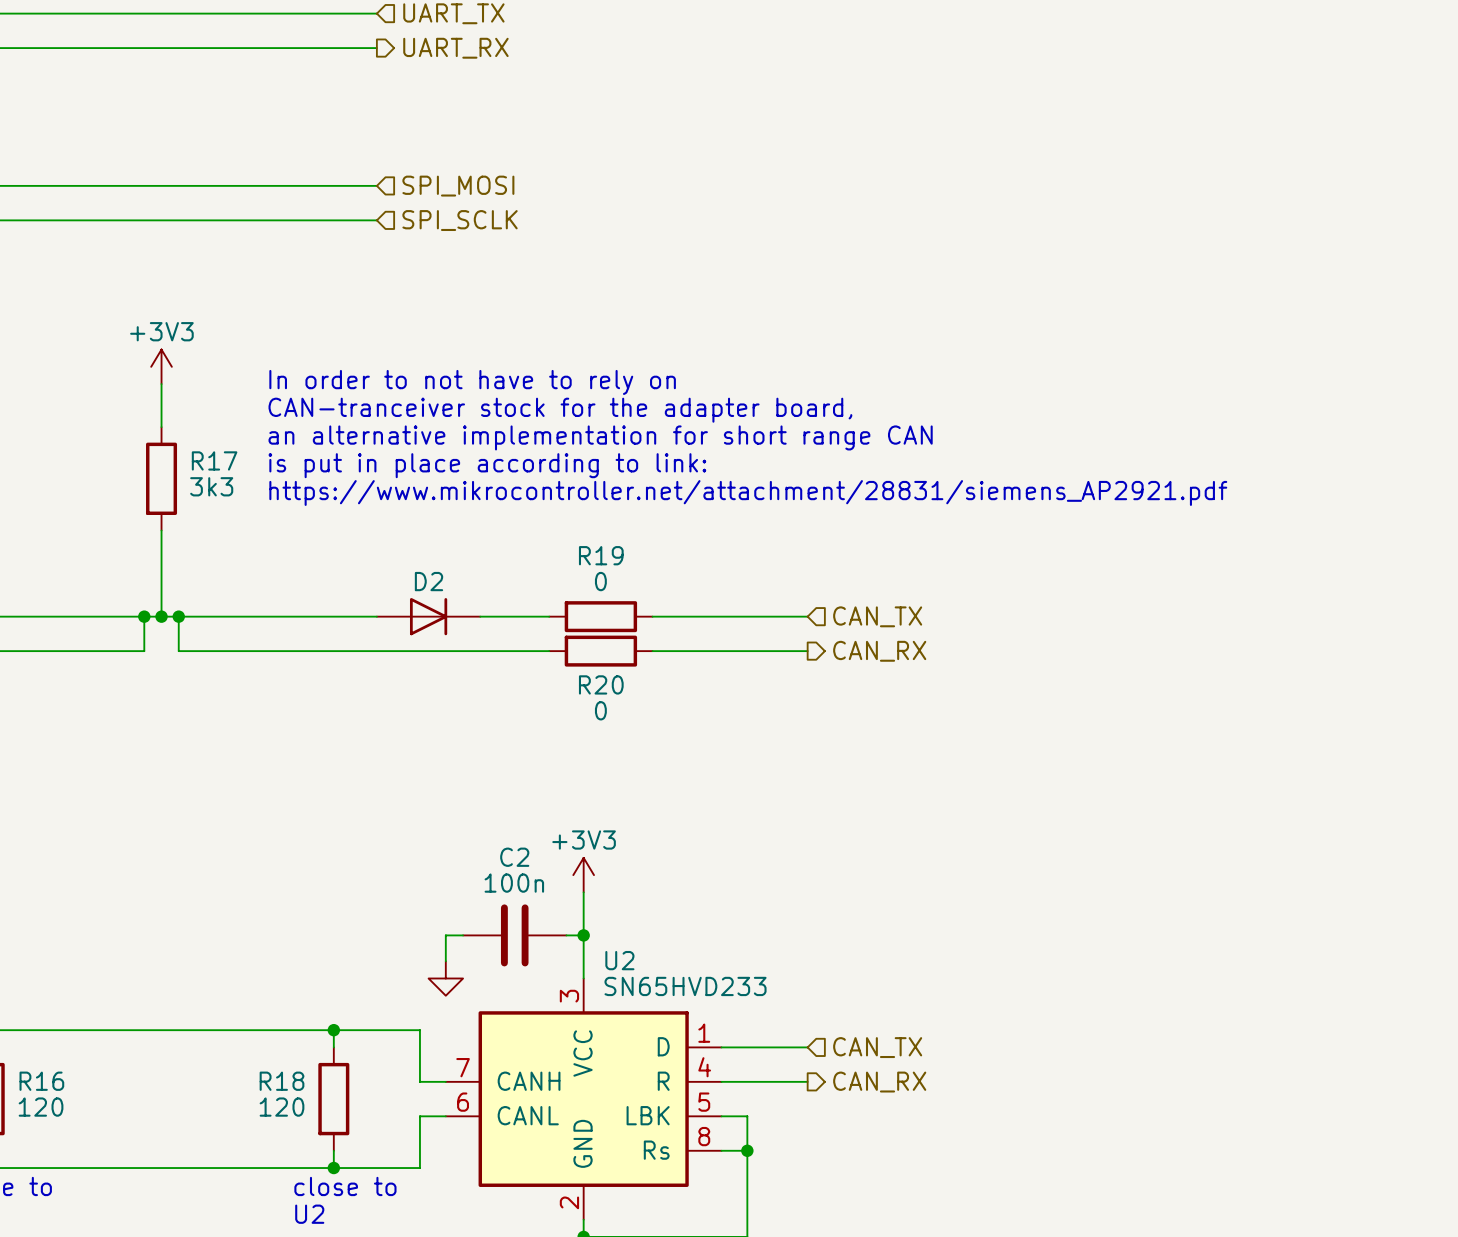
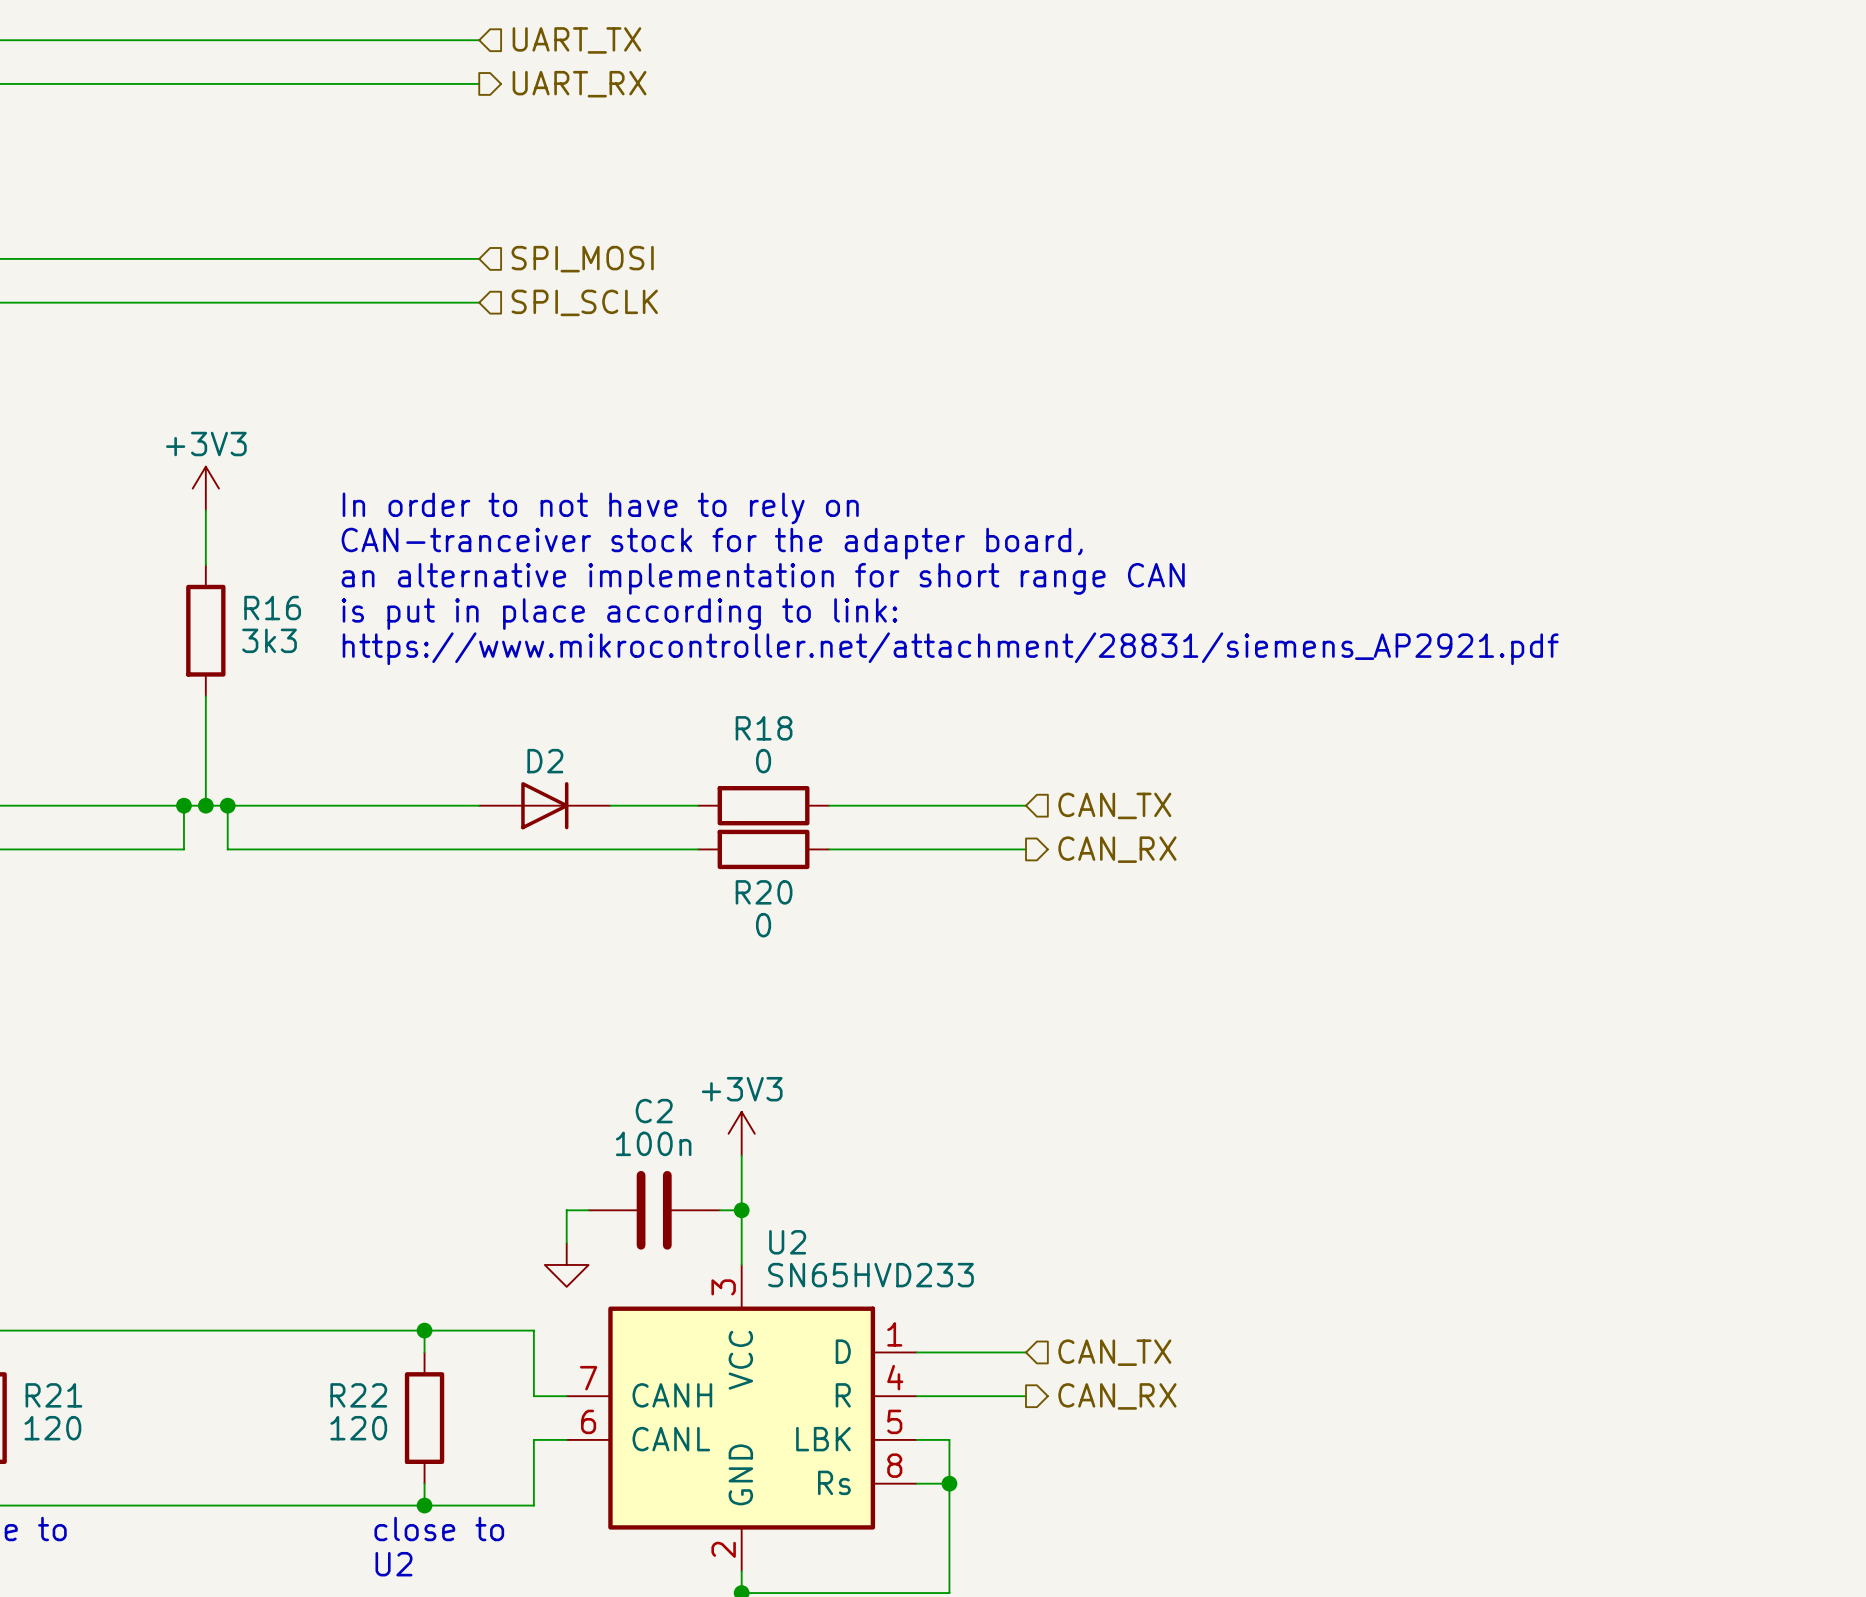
R17 name: R17 (214, 460) -> R16 (272, 608)
R19 name: R19 (601, 555) -> R18 (764, 728)
R16 name: R16 (41, 1081) -> R21 (53, 1395)
R18 name: R18 (282, 1081) -> R22 (358, 1395)

